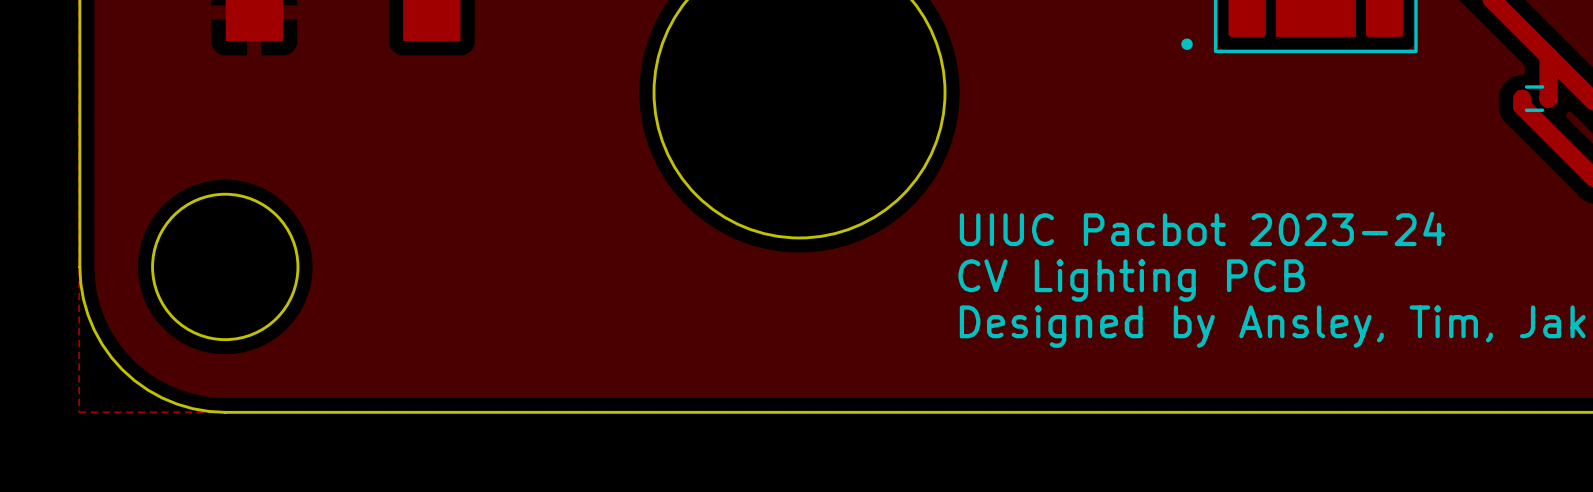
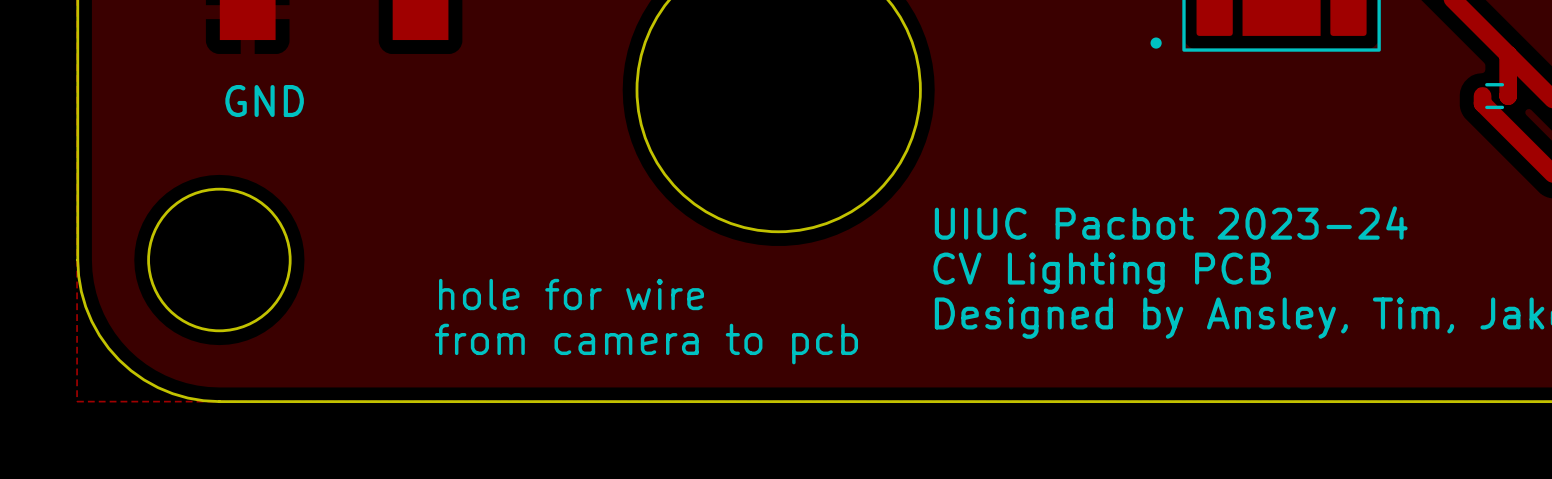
text: none -> GND (264, 101)
text: none -> hole for wire (571, 294)
text: none -> from camera to pcb (646, 344)

